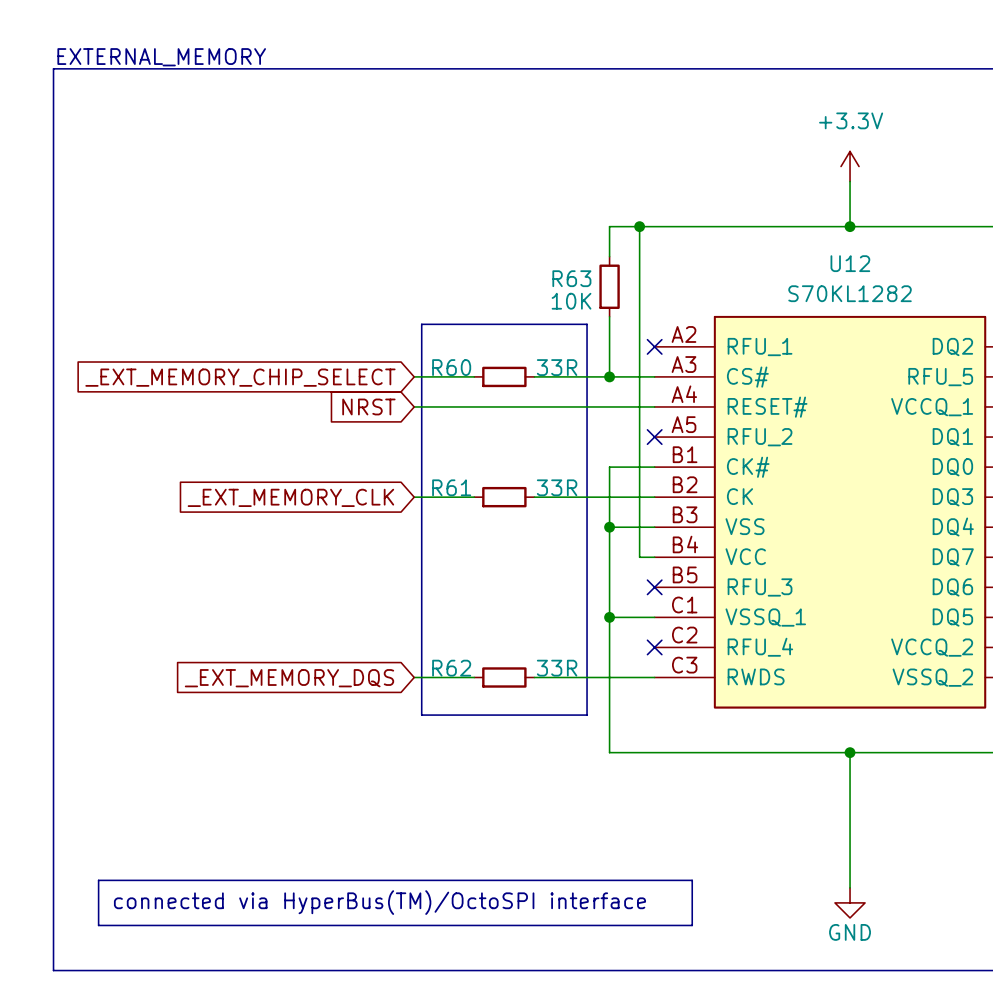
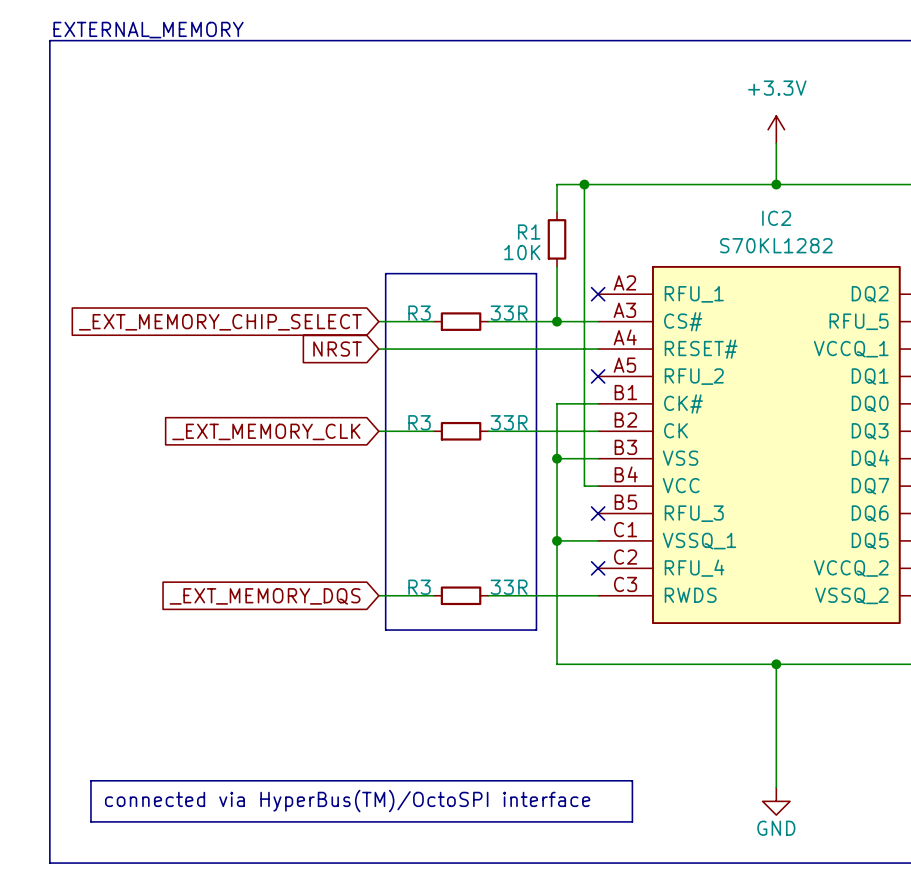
U12 name: U12 (850, 263) -> IC2 (776, 218)
R63 name: R63 (571, 278) -> R1 (529, 232)
R60 name: R60 (451, 367) -> R3 (419, 313)
R61 name: R61 (451, 487) -> R3 (419, 422)
R62 name: R62 (451, 668) -> R3 (419, 587)

